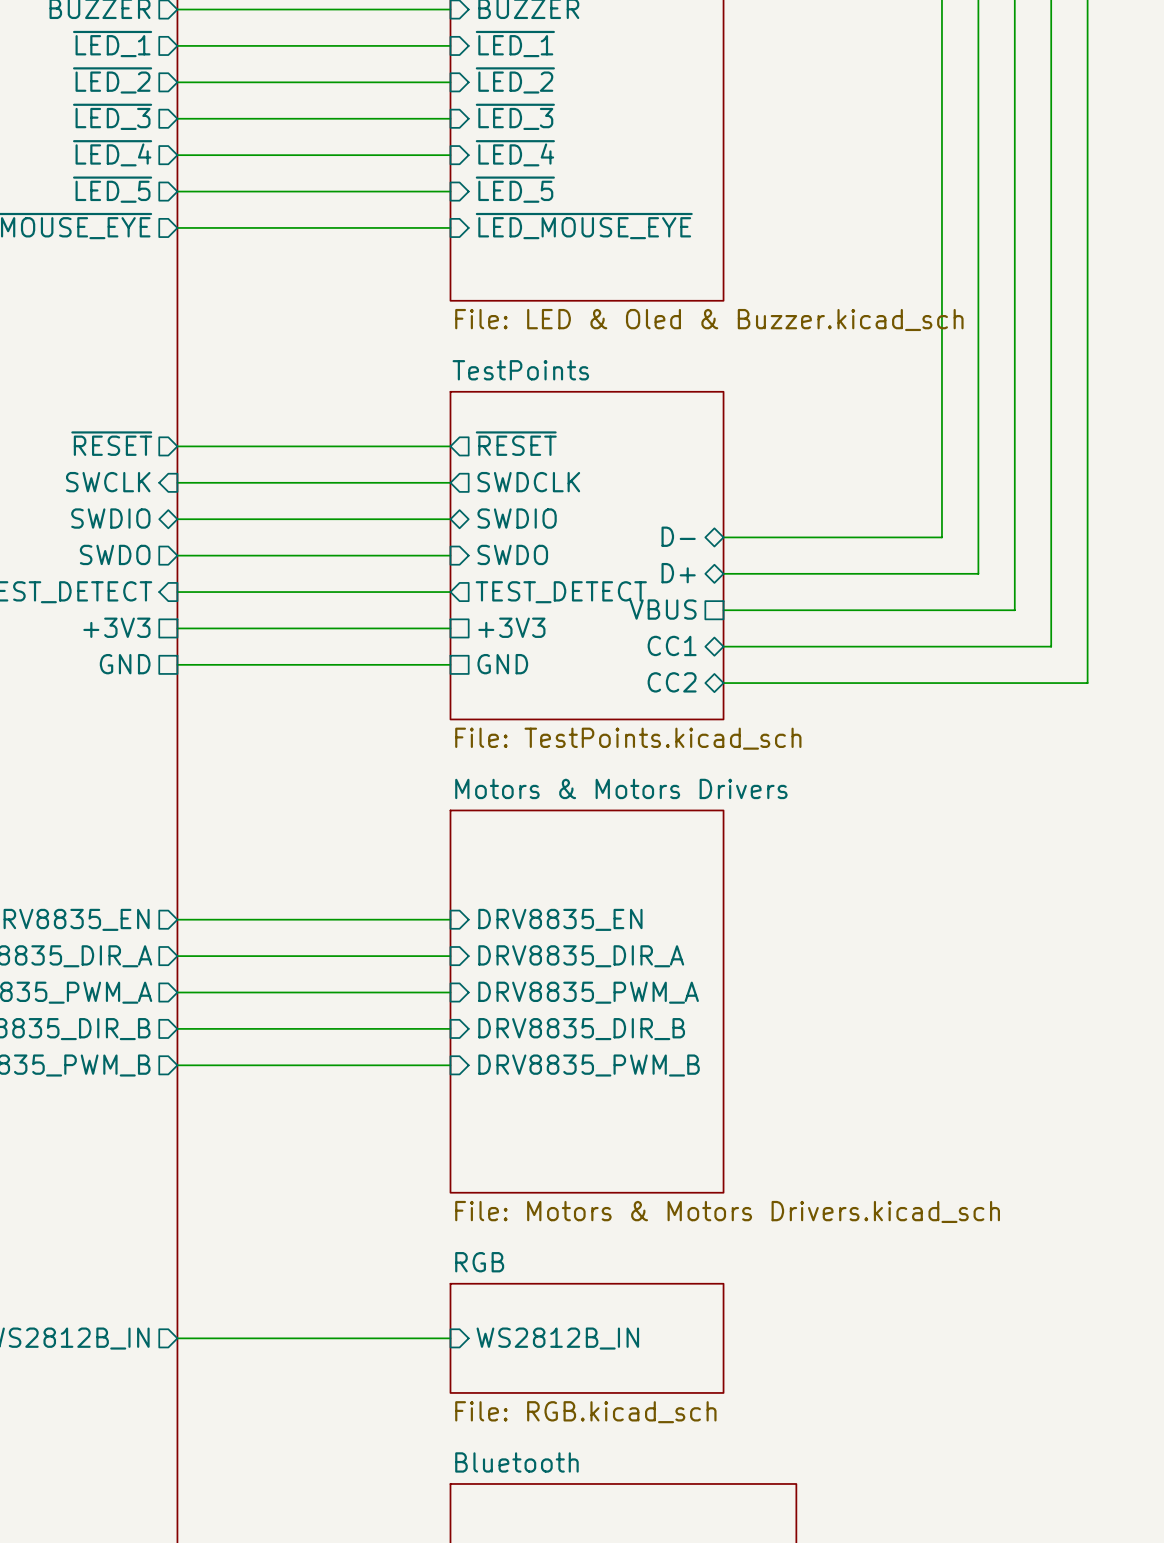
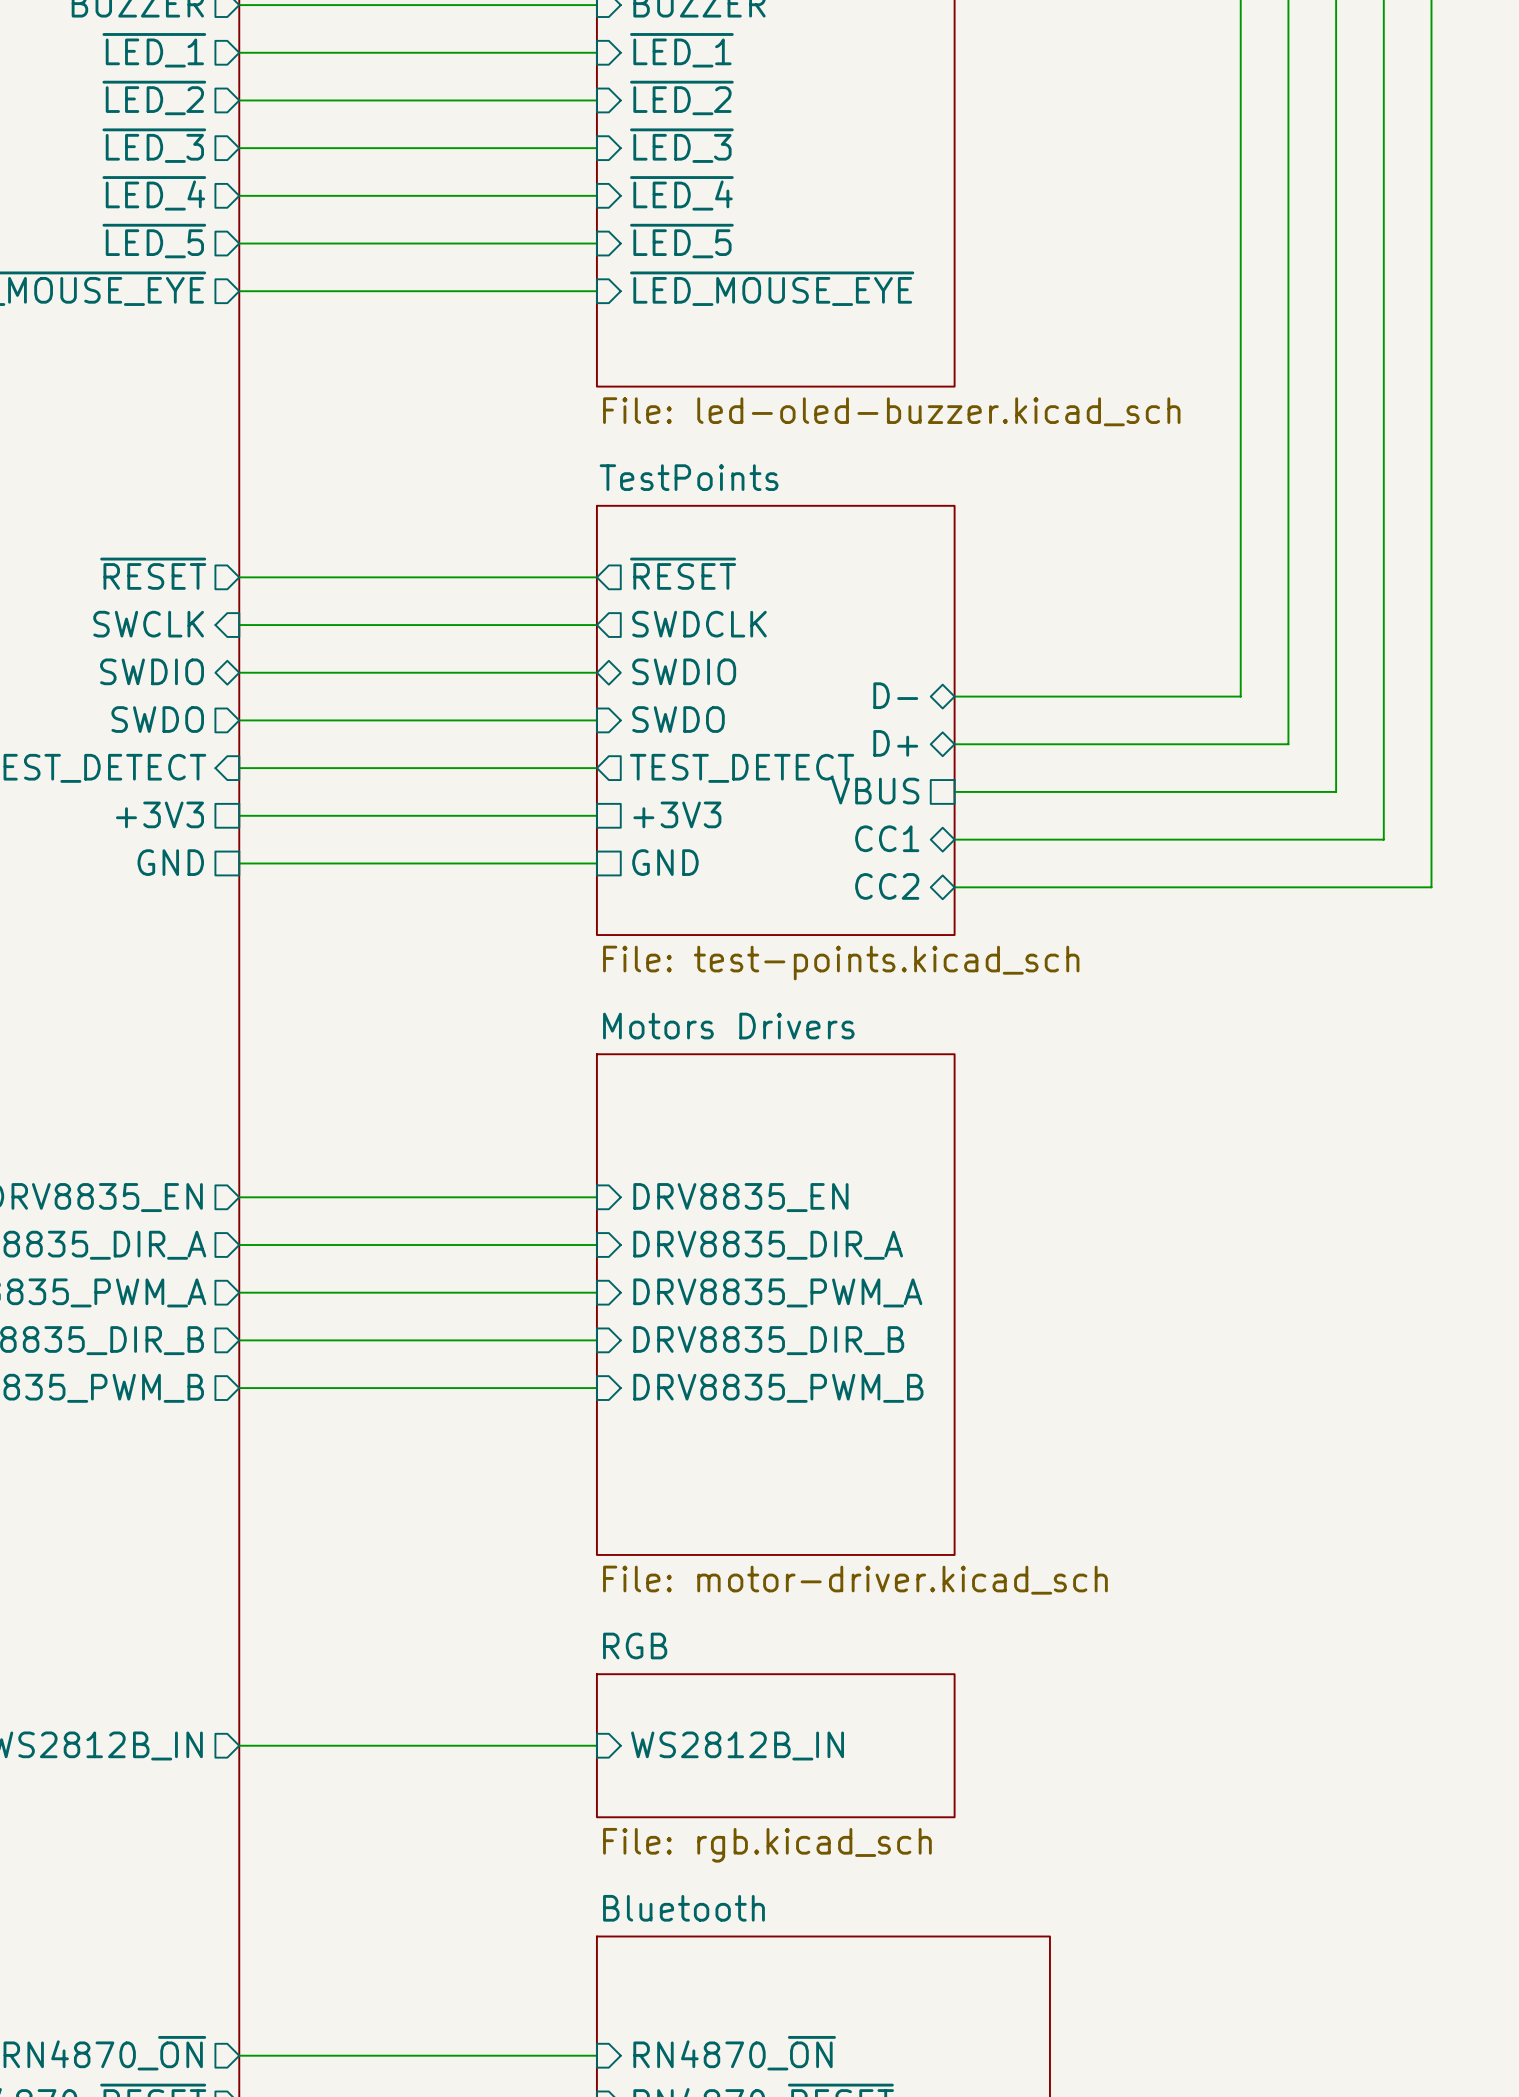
sheet value: File: LED & Oled & Buzzer.kicad_sch (709, 319) -> File: led-oled-buzzer.kicad_sch (891, 411)
sheet TestPoints value: File: TestPoints.kicad_sch (628, 738) -> File: test-points.kicad_sch (841, 963)
sheet Motors & Motors Drivers name: Motors & Motors Drivers (621, 788) -> Motors Drivers (728, 1026)
sheet Motors & Motors Drivers value: File: Motors & Motors Drivers.kicad_sch (727, 1211) -> File: motor-driver.kicad_sch (855, 1580)
sheet RGB value: File: RGB.kicad_sch (585, 1412) -> File: rgb.kicad_sch (767, 1845)

